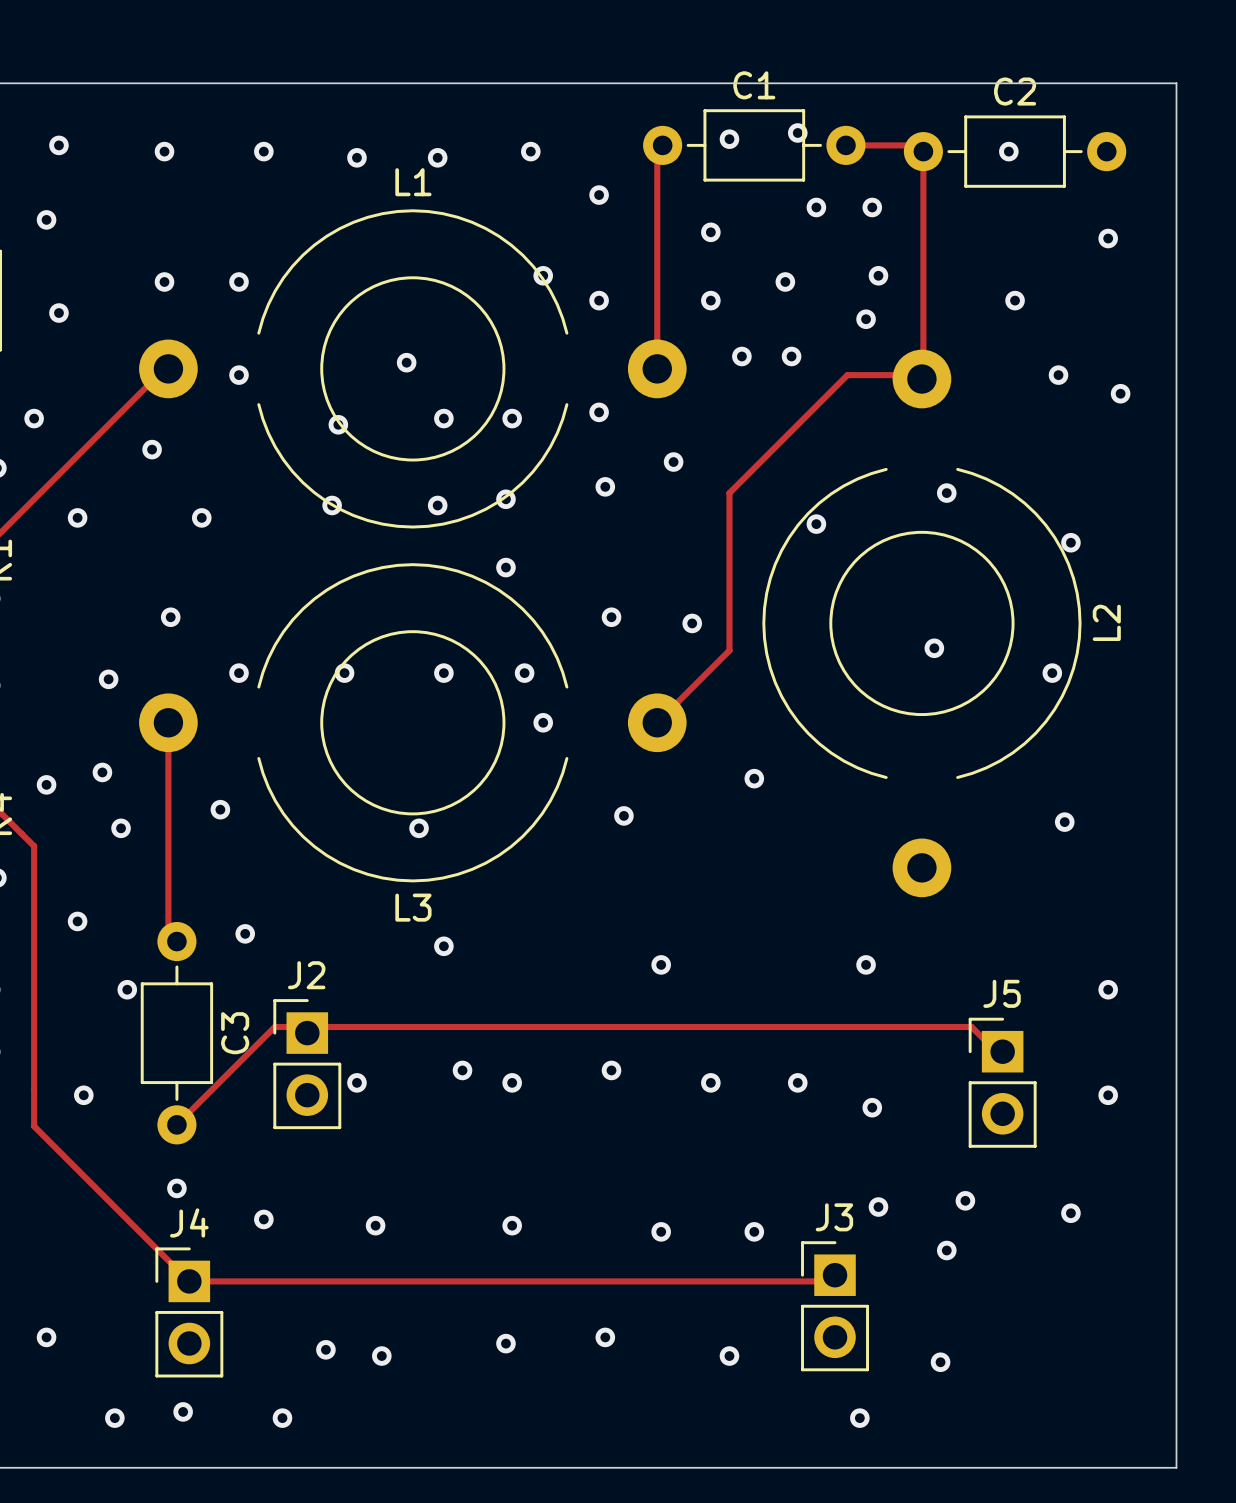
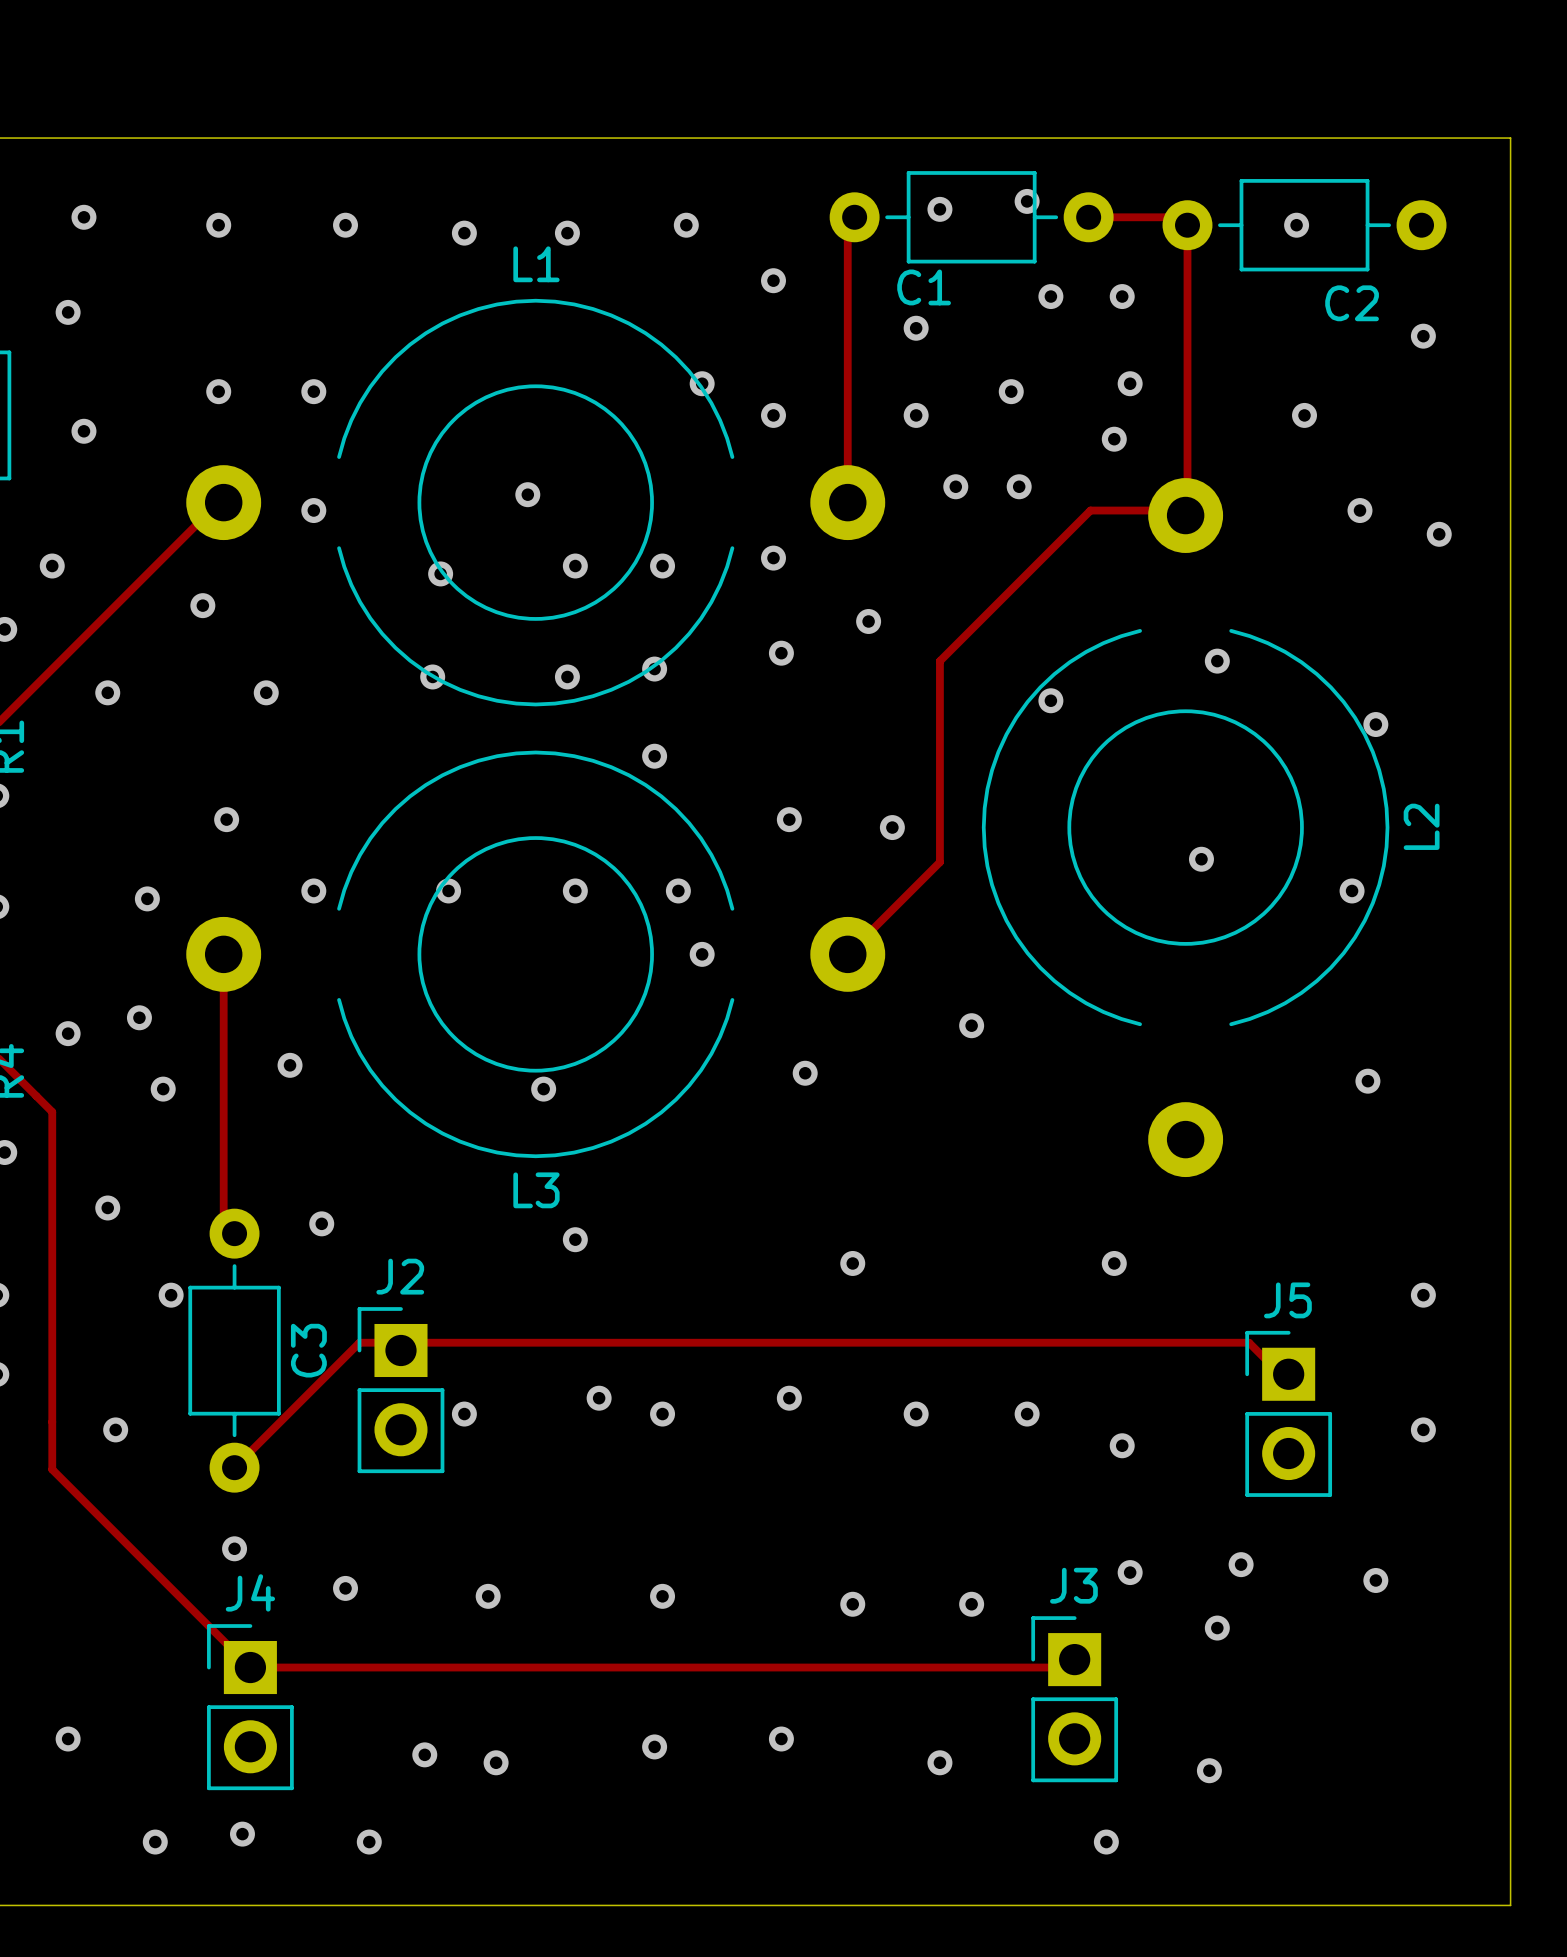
C1 name position: C1 (754, 85) -> C1 (924, 287)
C2 name position: C2 (1015, 91) -> C2 (1352, 303)

